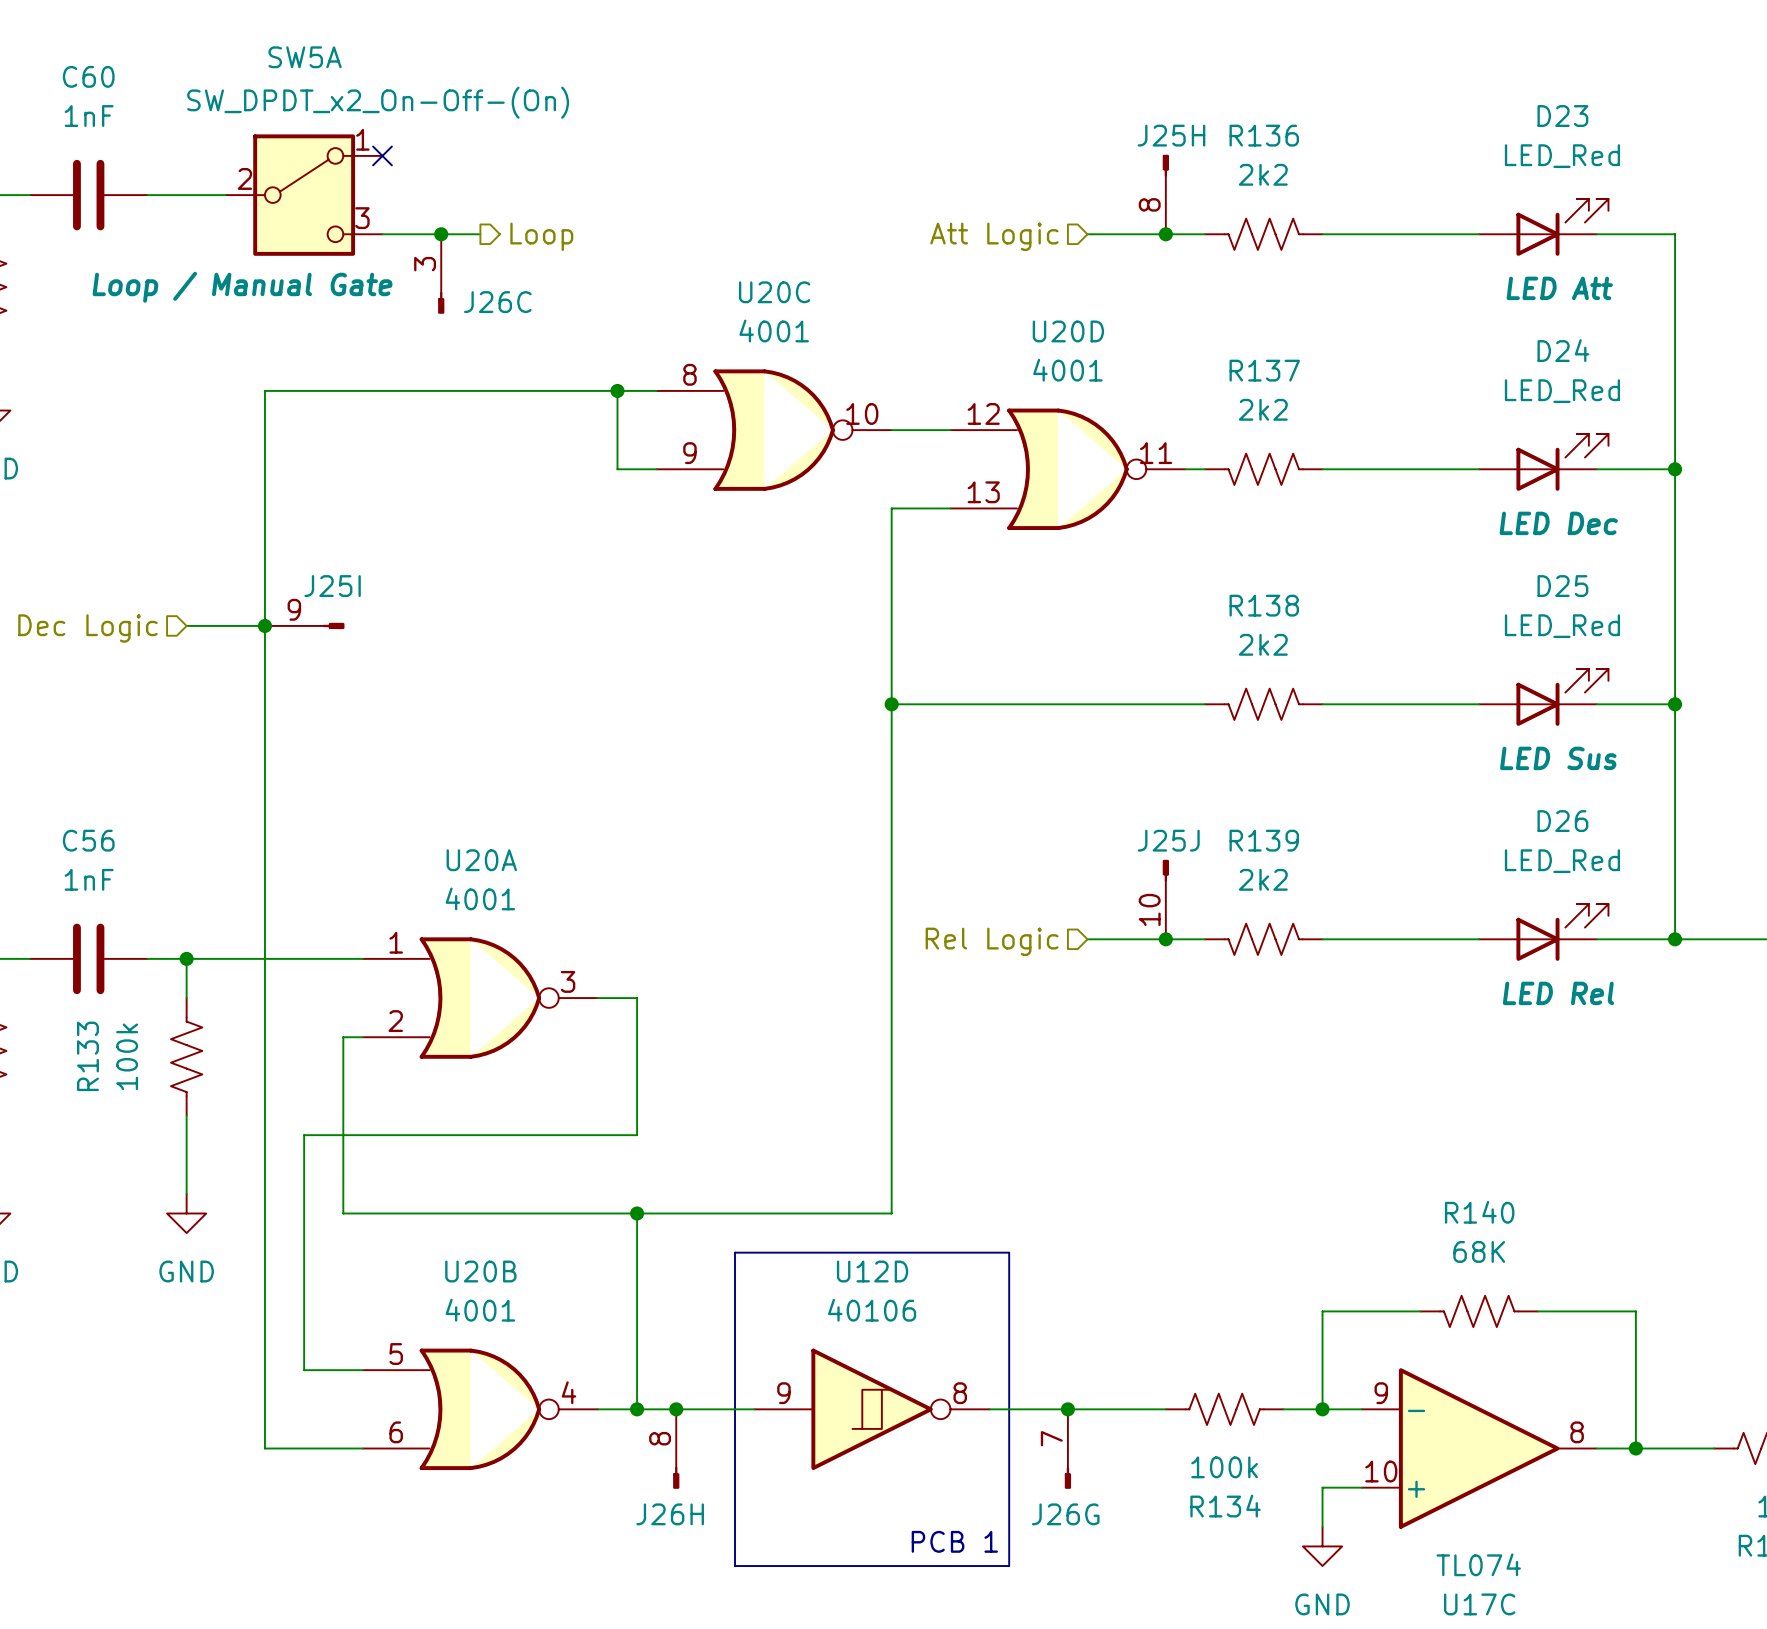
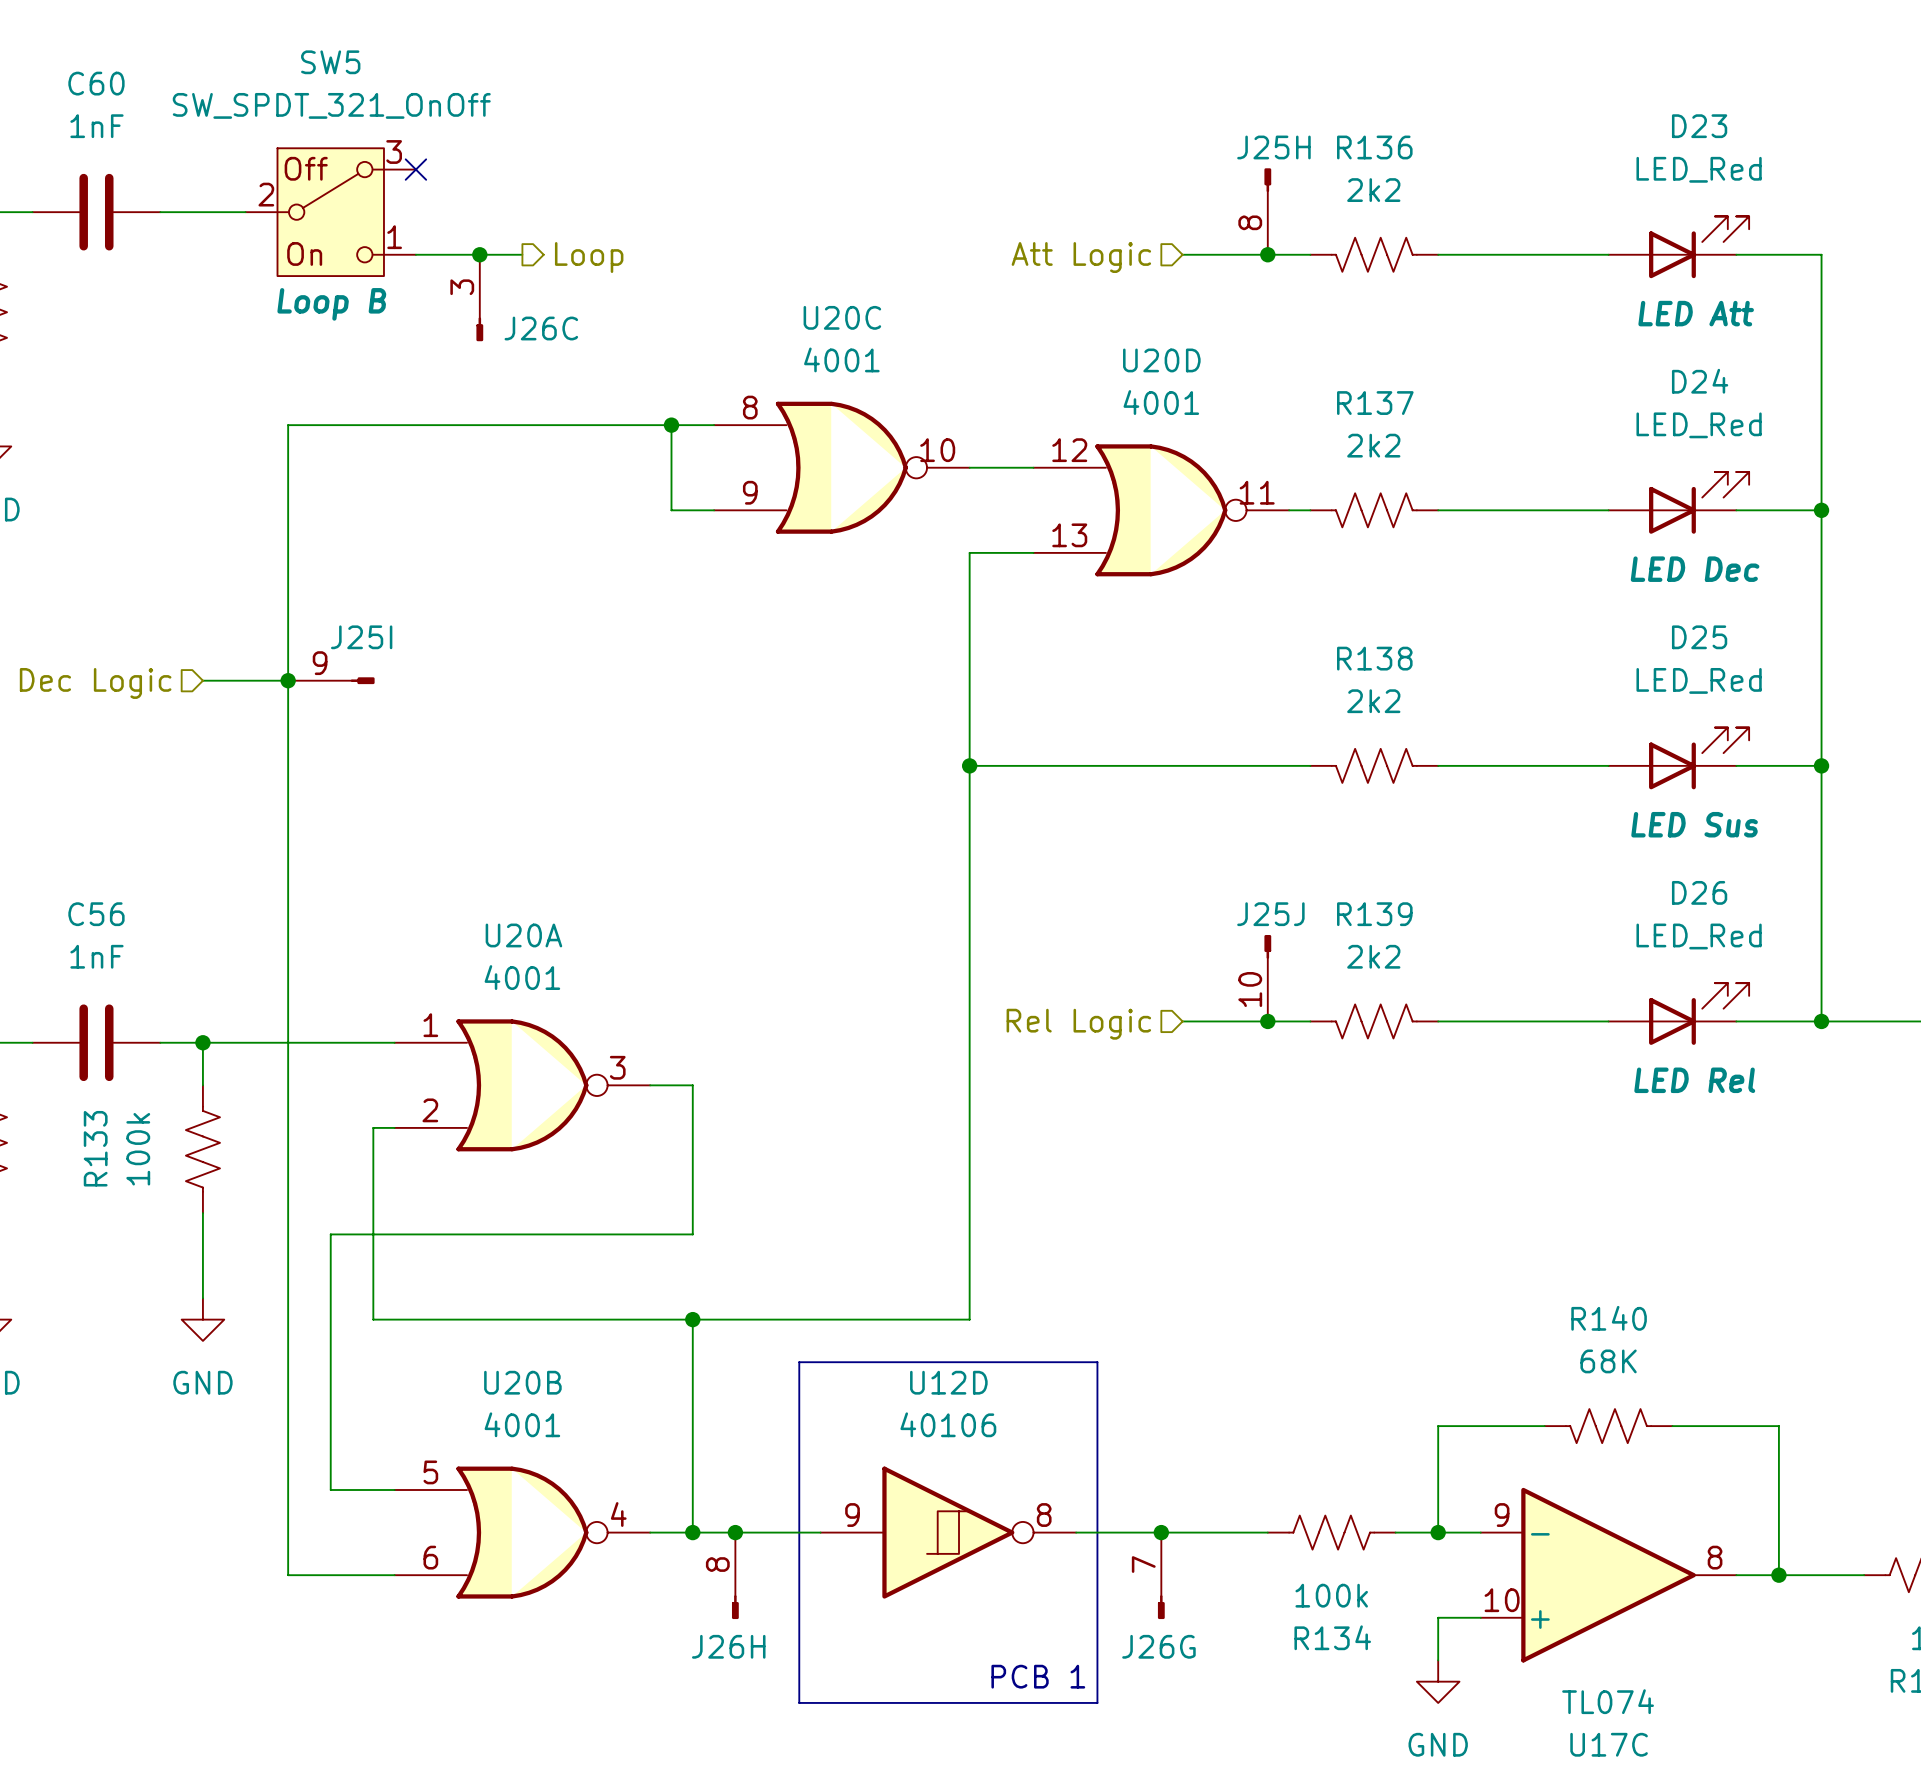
SW5A: SW_DPDT_x2_On-Off-(On) (304, 195) -> none
SW5: none -> SW_SPDT_321_OnOff (330, 212)

